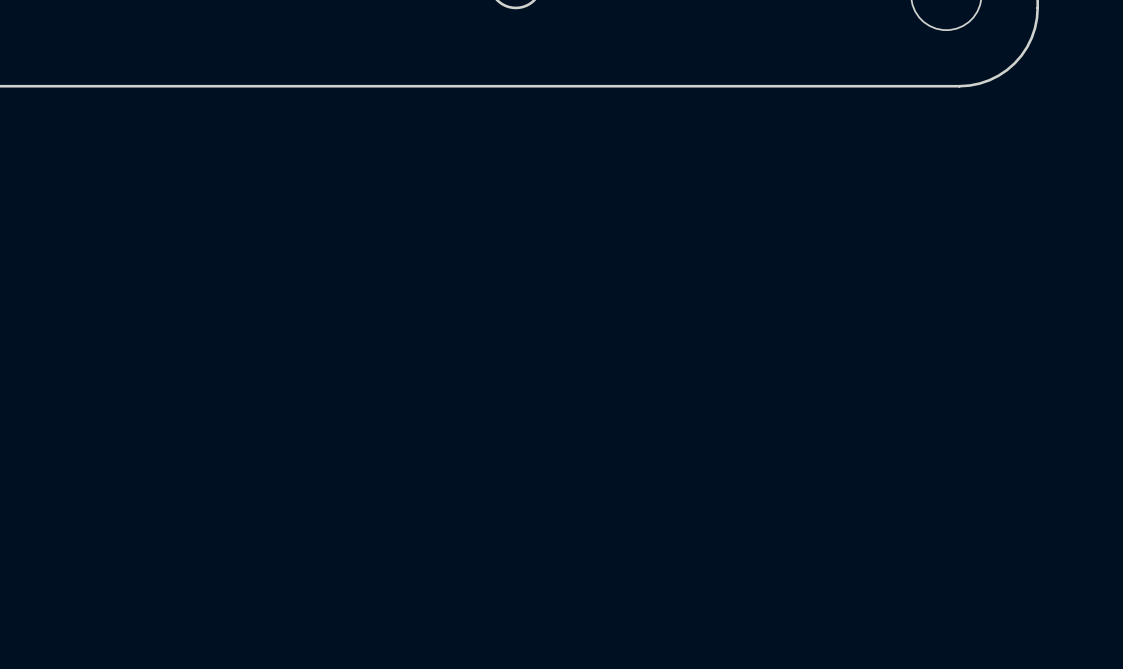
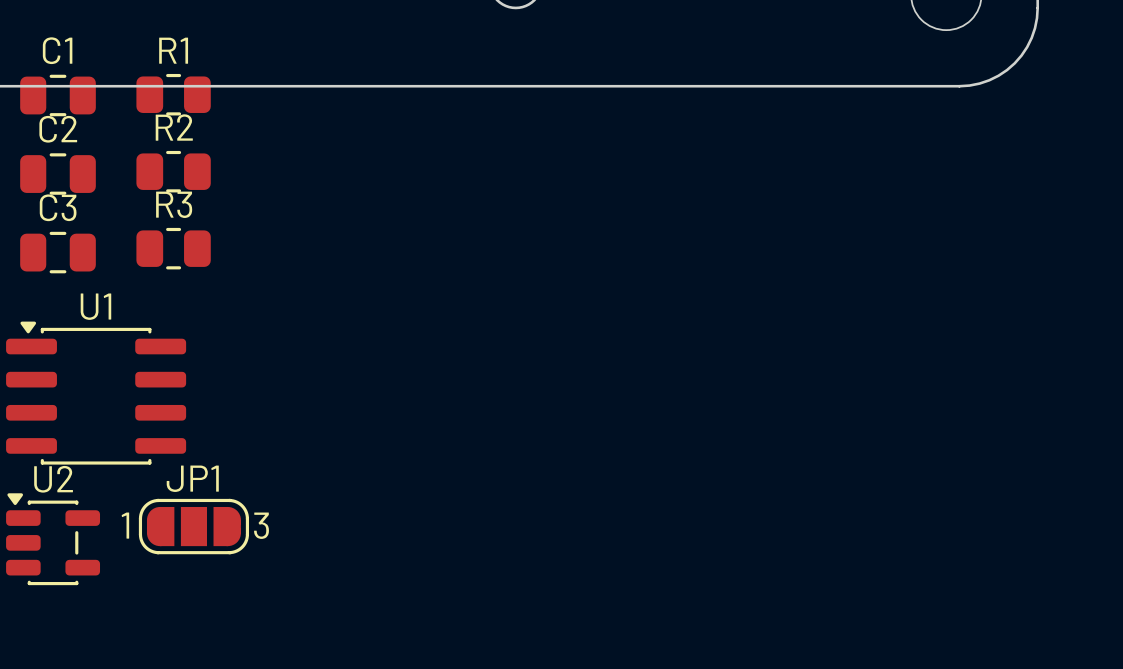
R1: none -> (173, 94)
C1: none -> (58, 95)
R2: none -> (173, 171)
C2: none -> (58, 174)
R3: none -> (173, 248)
C3: none -> (58, 252)
U1: none -> (96, 393)
JP1: none -> (193, 526)
U2: none -> (53, 539)

